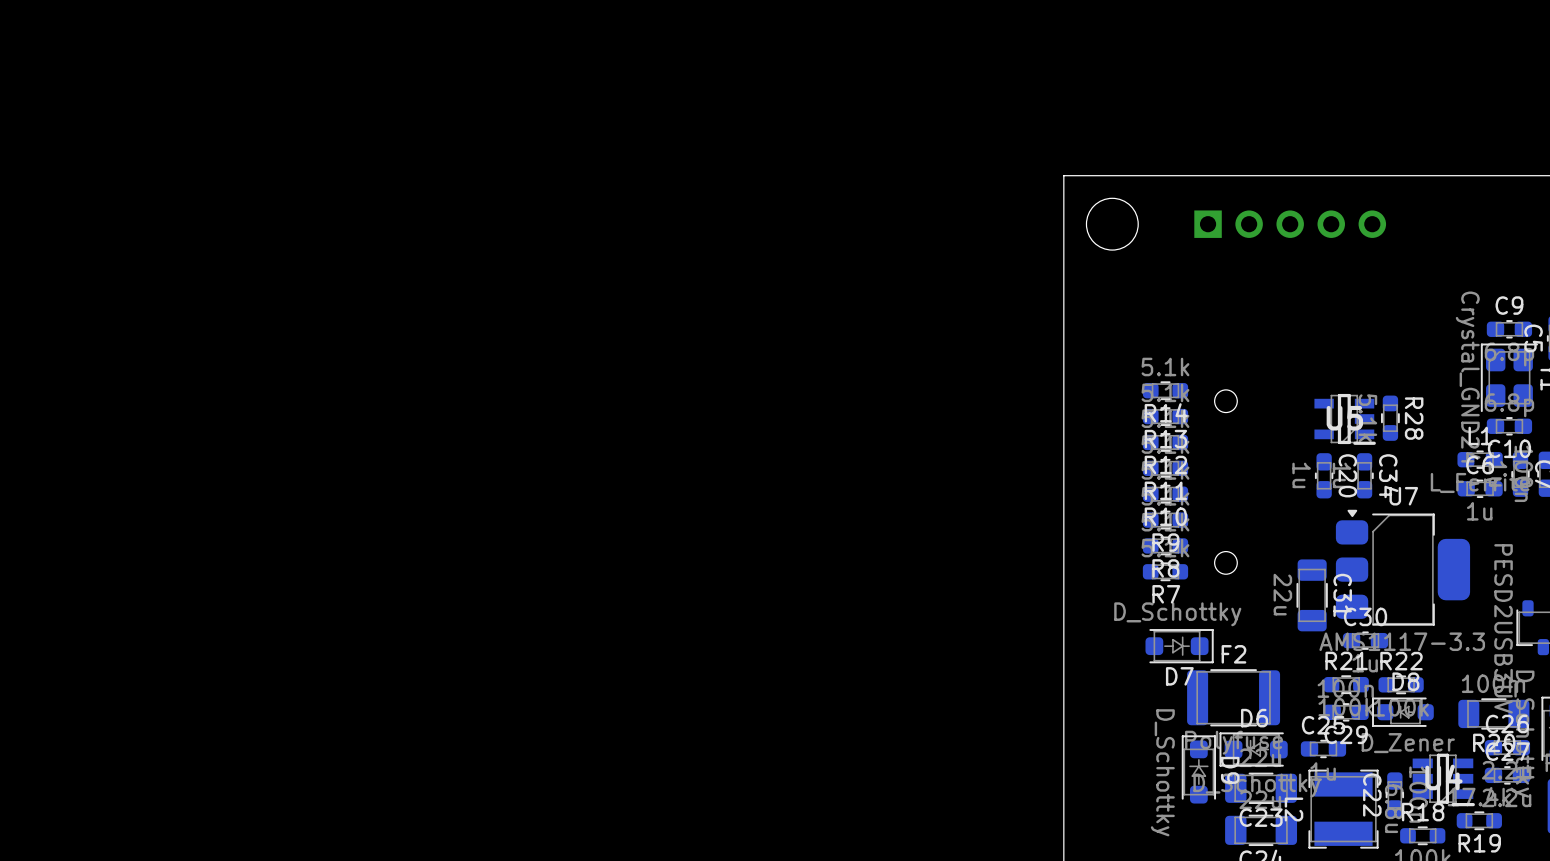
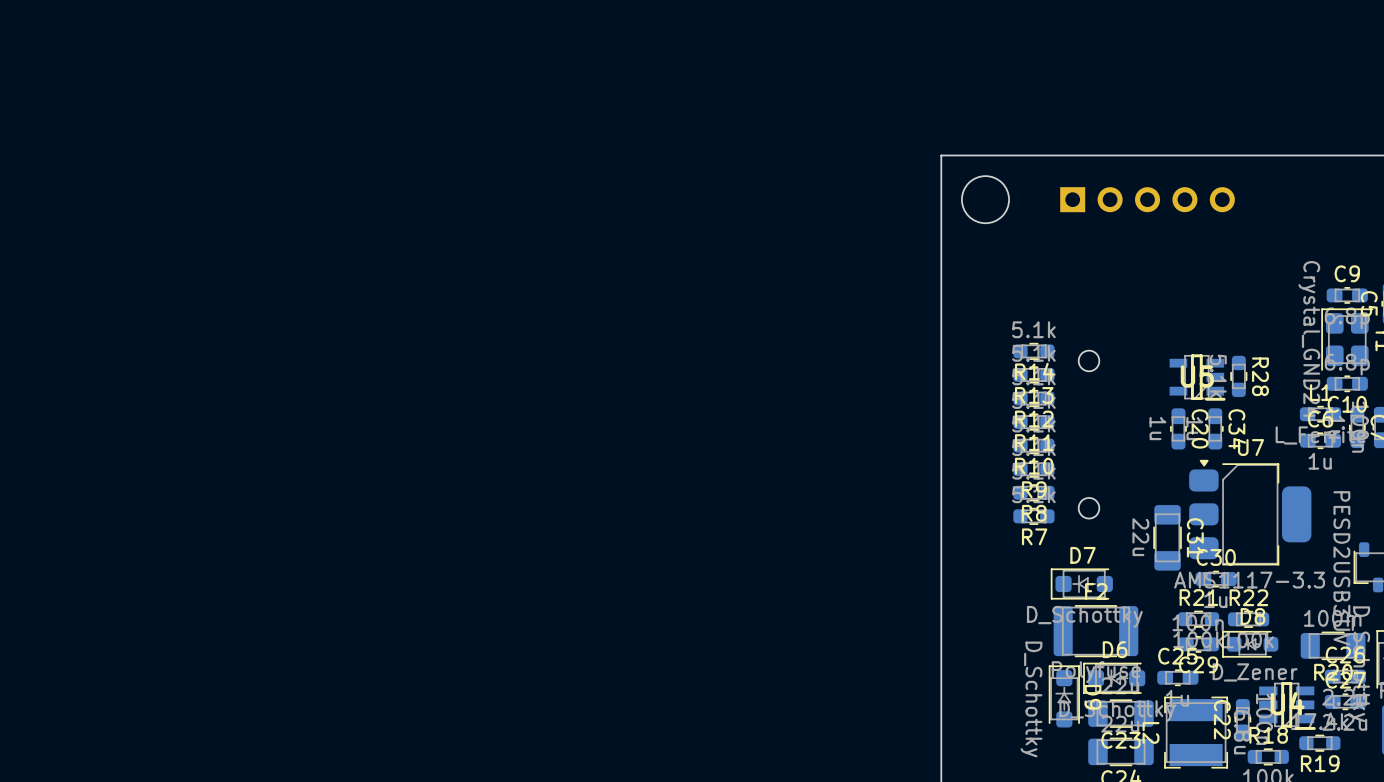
D7 rotation: 0° (1179, 646) -> 180° (1081, 584)

